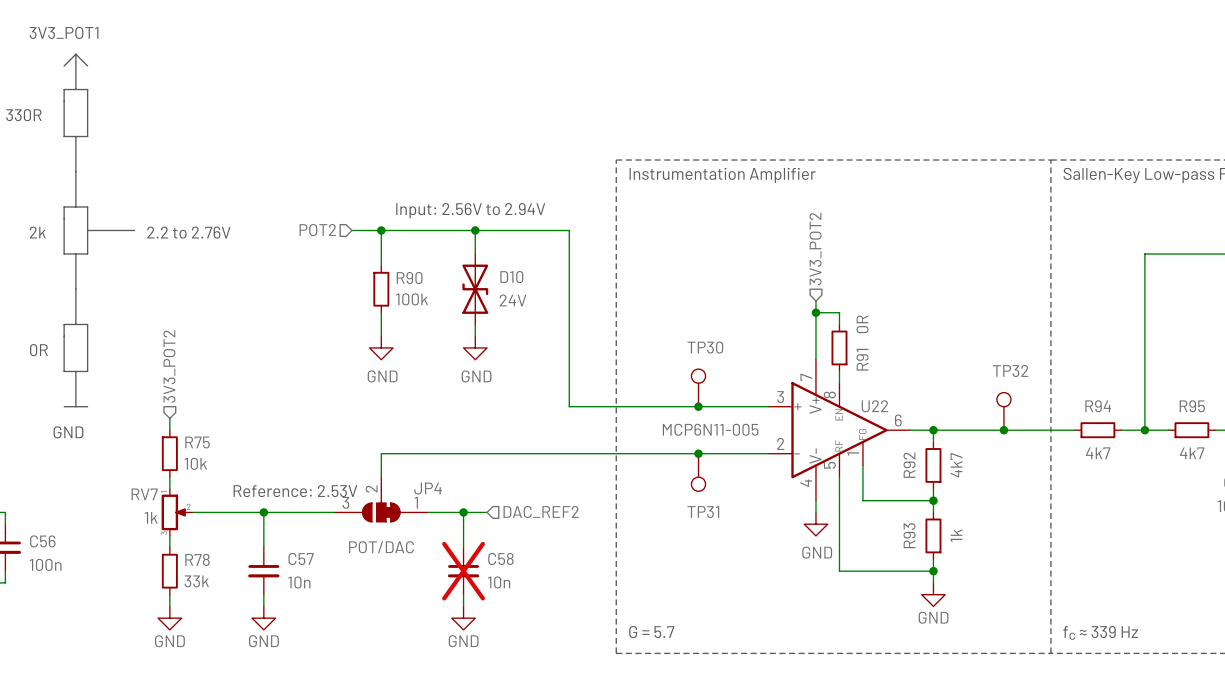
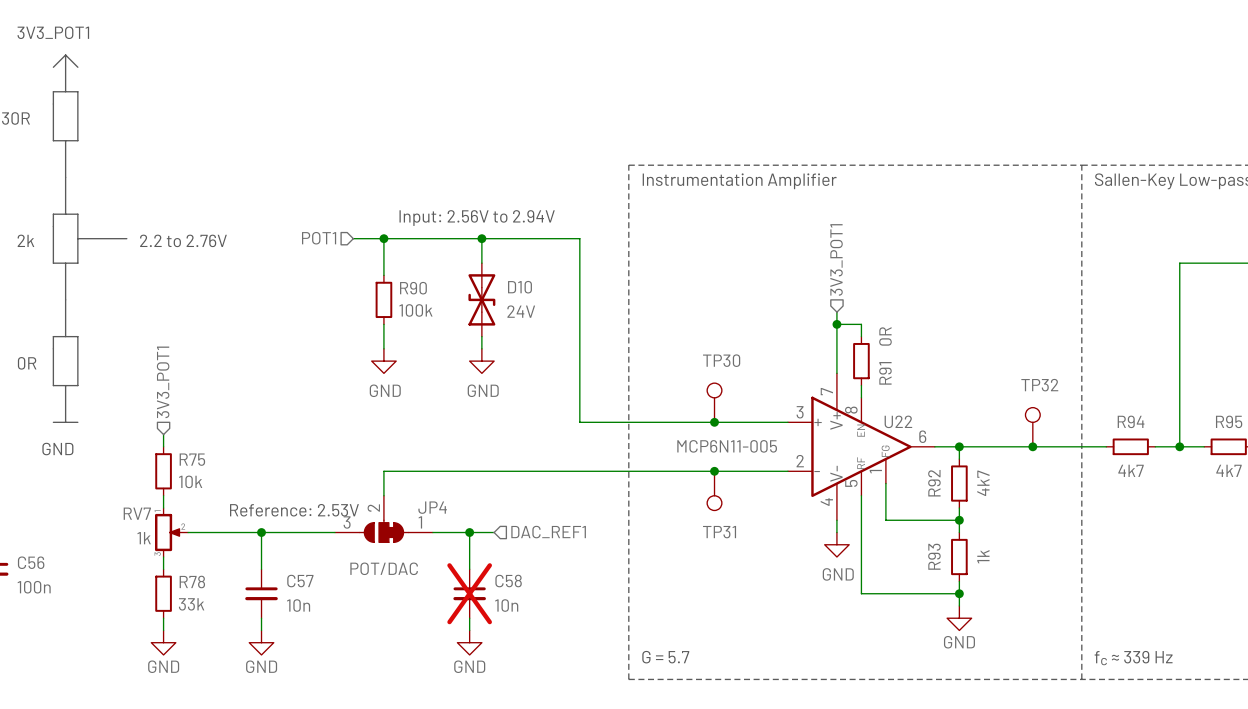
hierarchical label: POT2 (317, 230) -> POT1 (319, 238)
hierarchical label: 3V3_POT2 (815, 249) -> 3V3_POT1 (836, 259)
hierarchical label: 3V3_POT2 (169, 366) -> 3V3_POT1 (163, 382)
hierarchical label: DAC_REF2 (541, 512) -> DAC_REF1 (548, 532)

